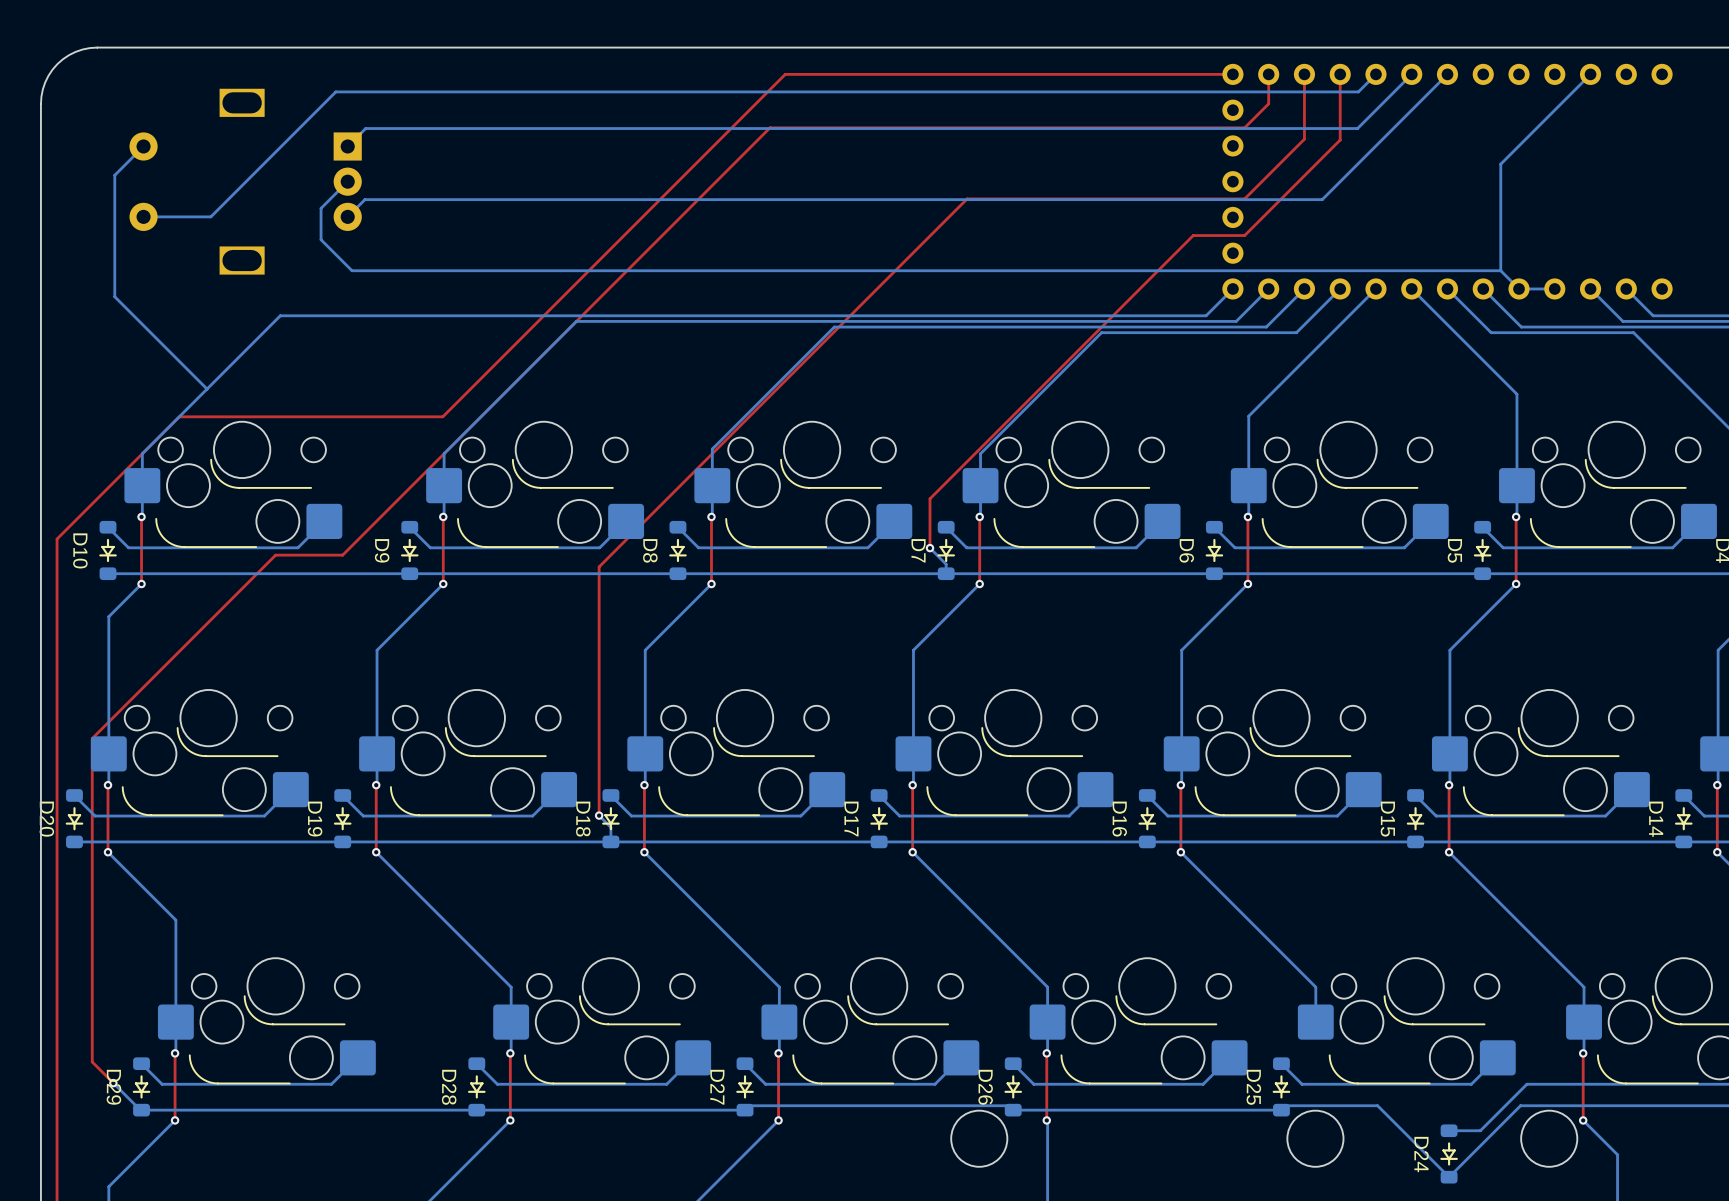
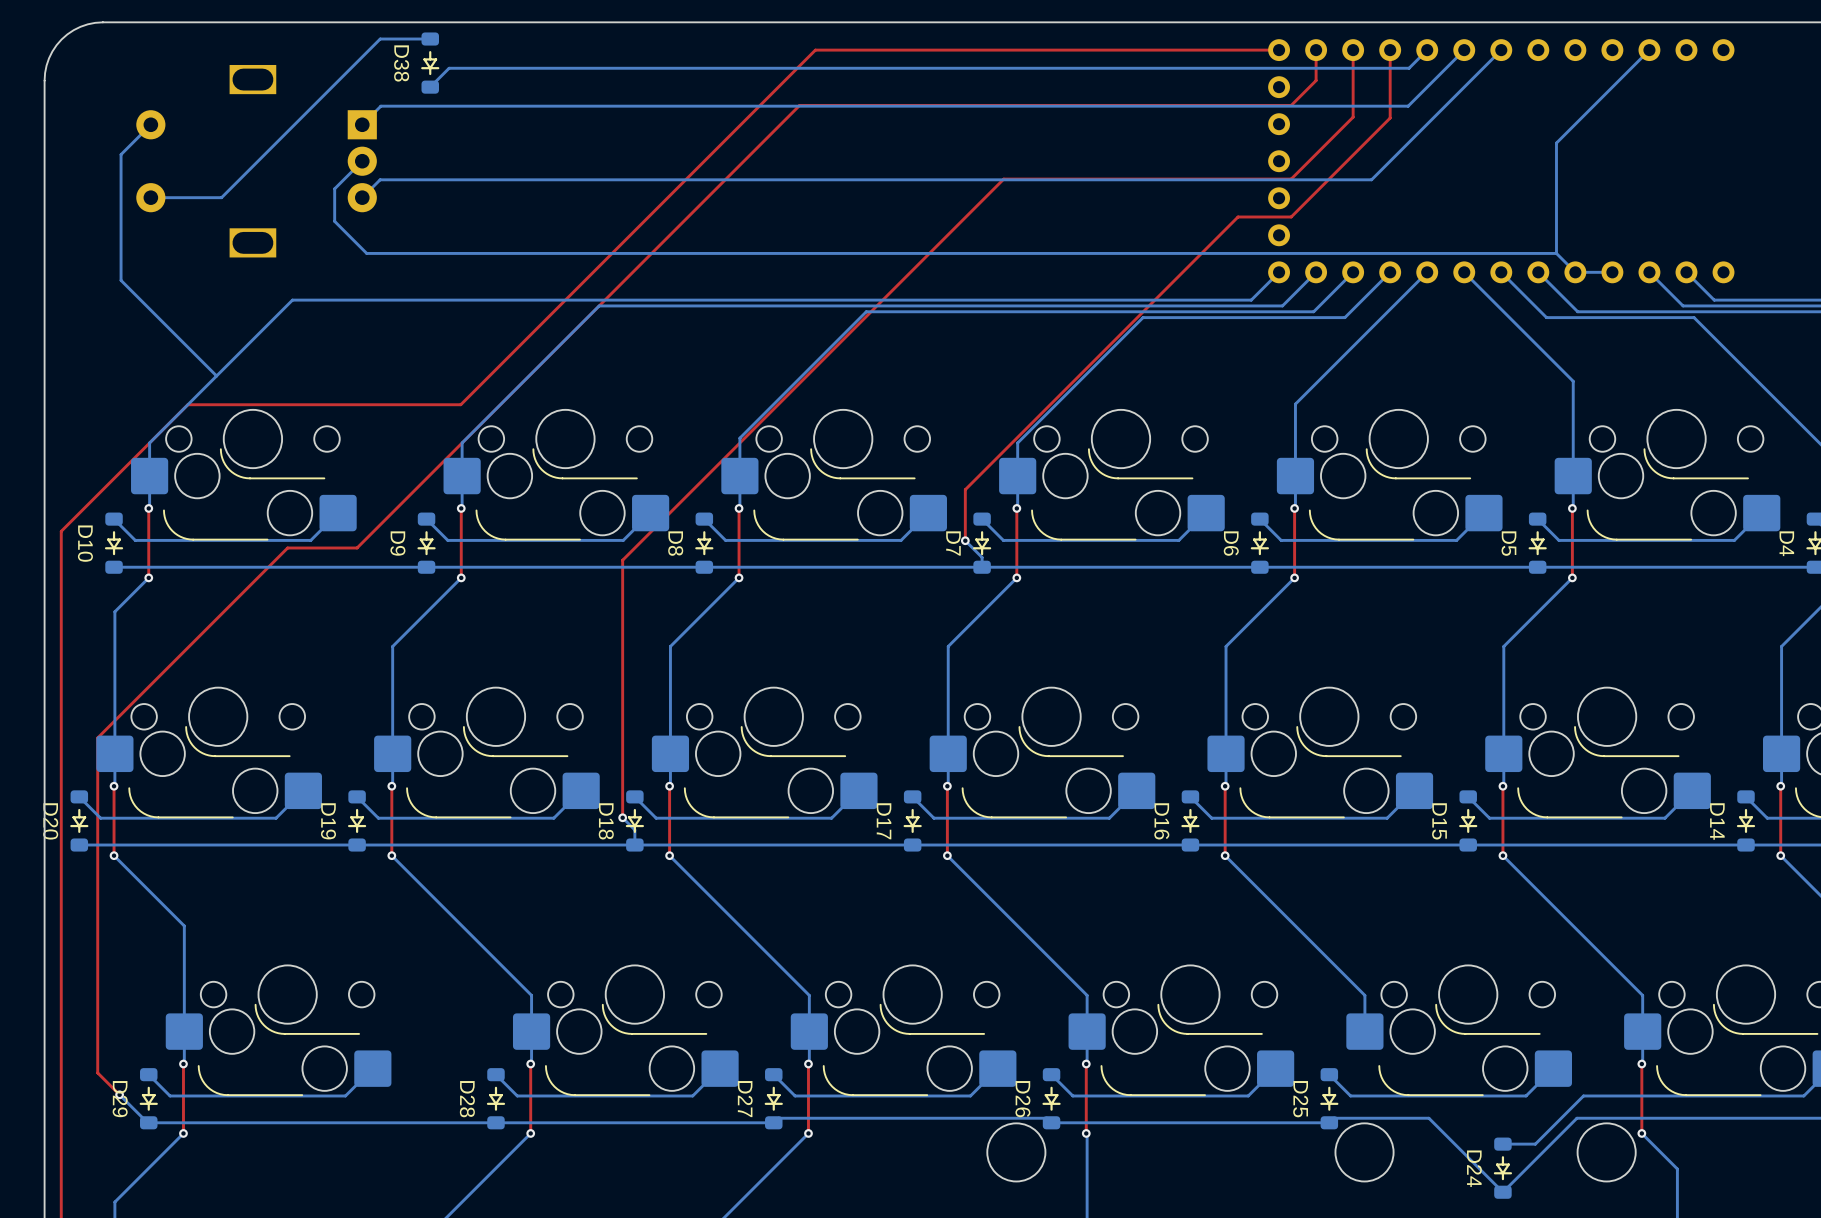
D38: none -> (430, 63)
bottom track: (431, 91) (335, 91) (210, 216) -> (430, 39) (380, 39) (220, 197)
bottom track: none -> (449, 68) (430, 87)

